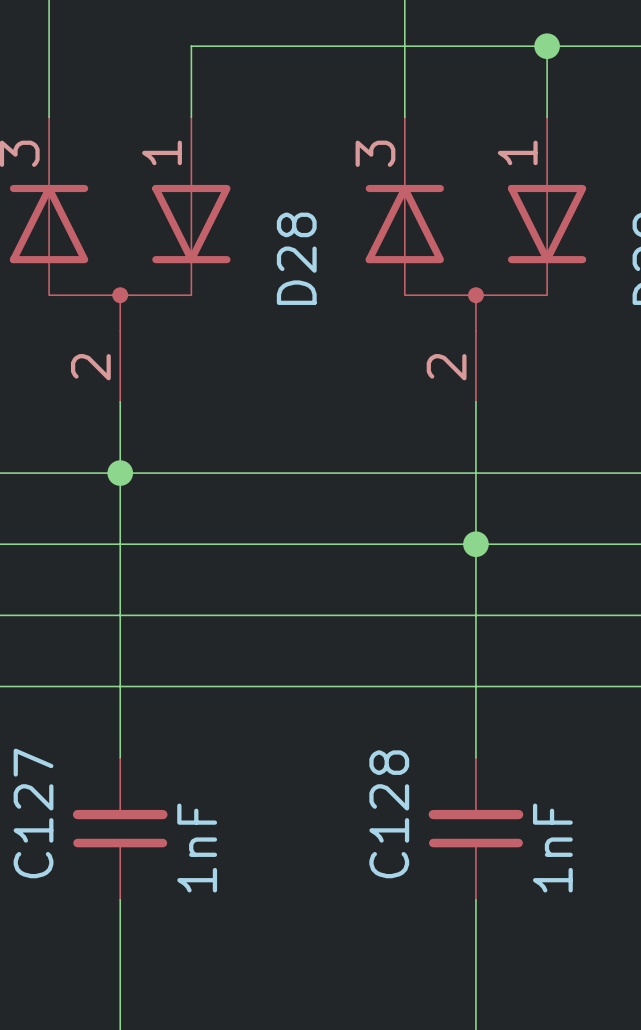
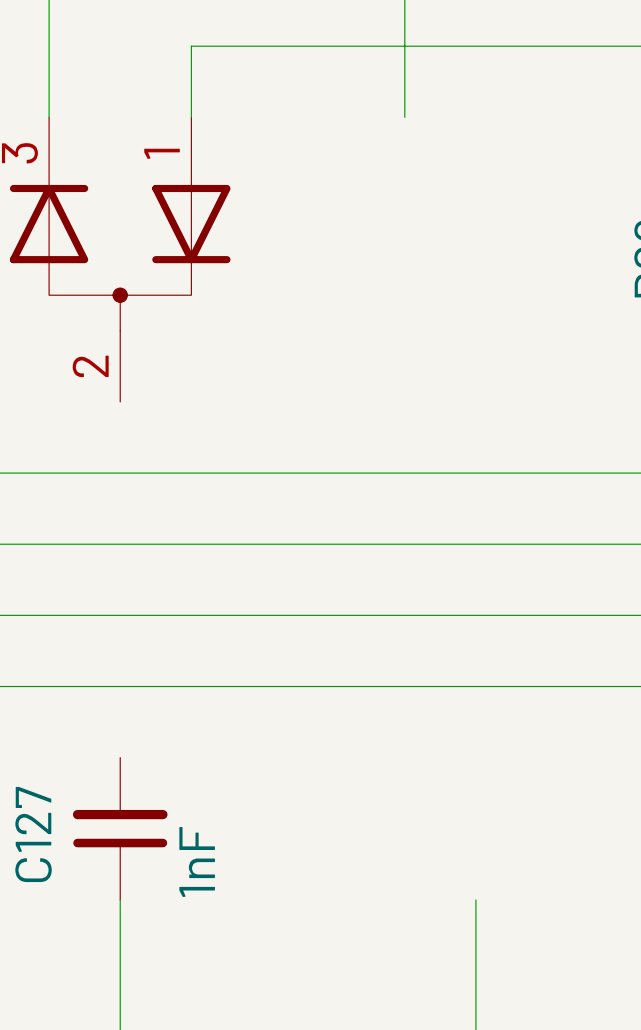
wire: (547, 46) (547, 117) -> none
junction: (547, 46) -> none
D28: (475, 259) -> none
wire: (120, 401) (120, 757) -> none
wire: (475, 401) (475, 757) -> none
junction: (120, 473) -> none
junction: (475, 544) -> none
C128: 1nF (475, 828) -> none

